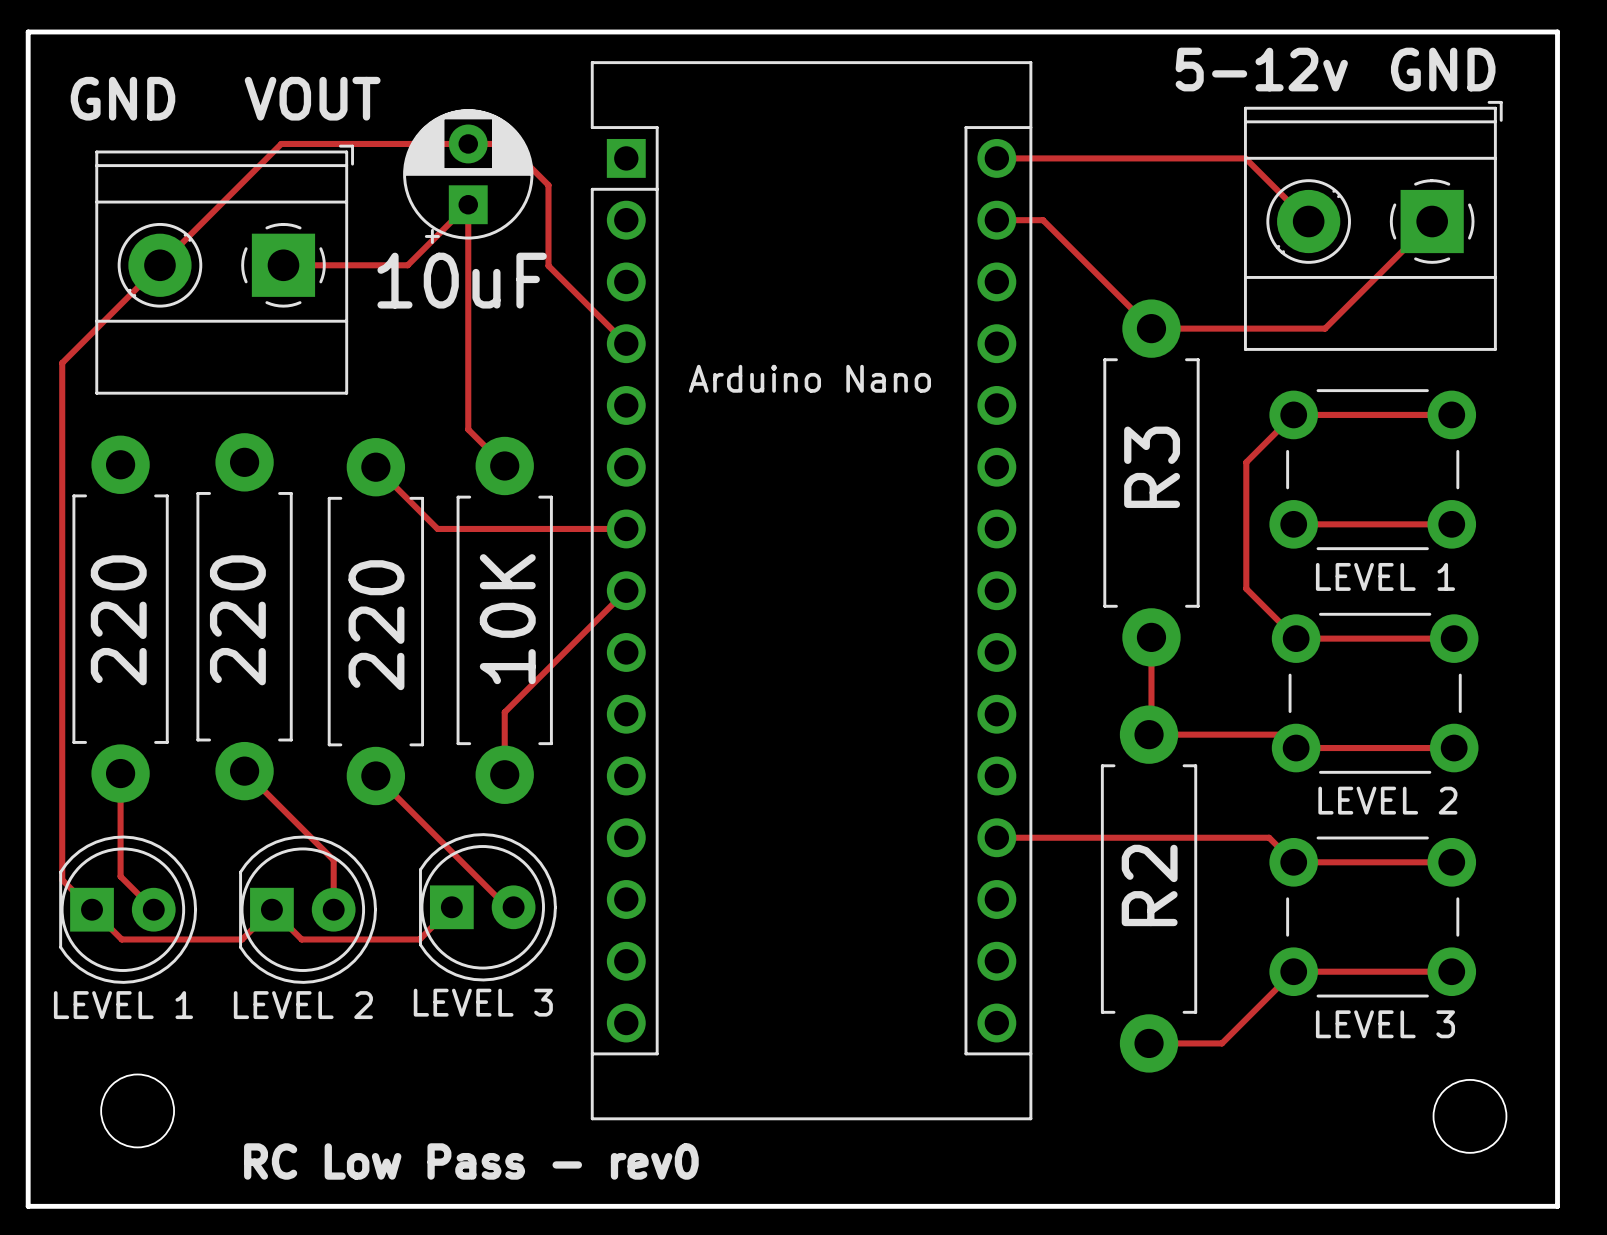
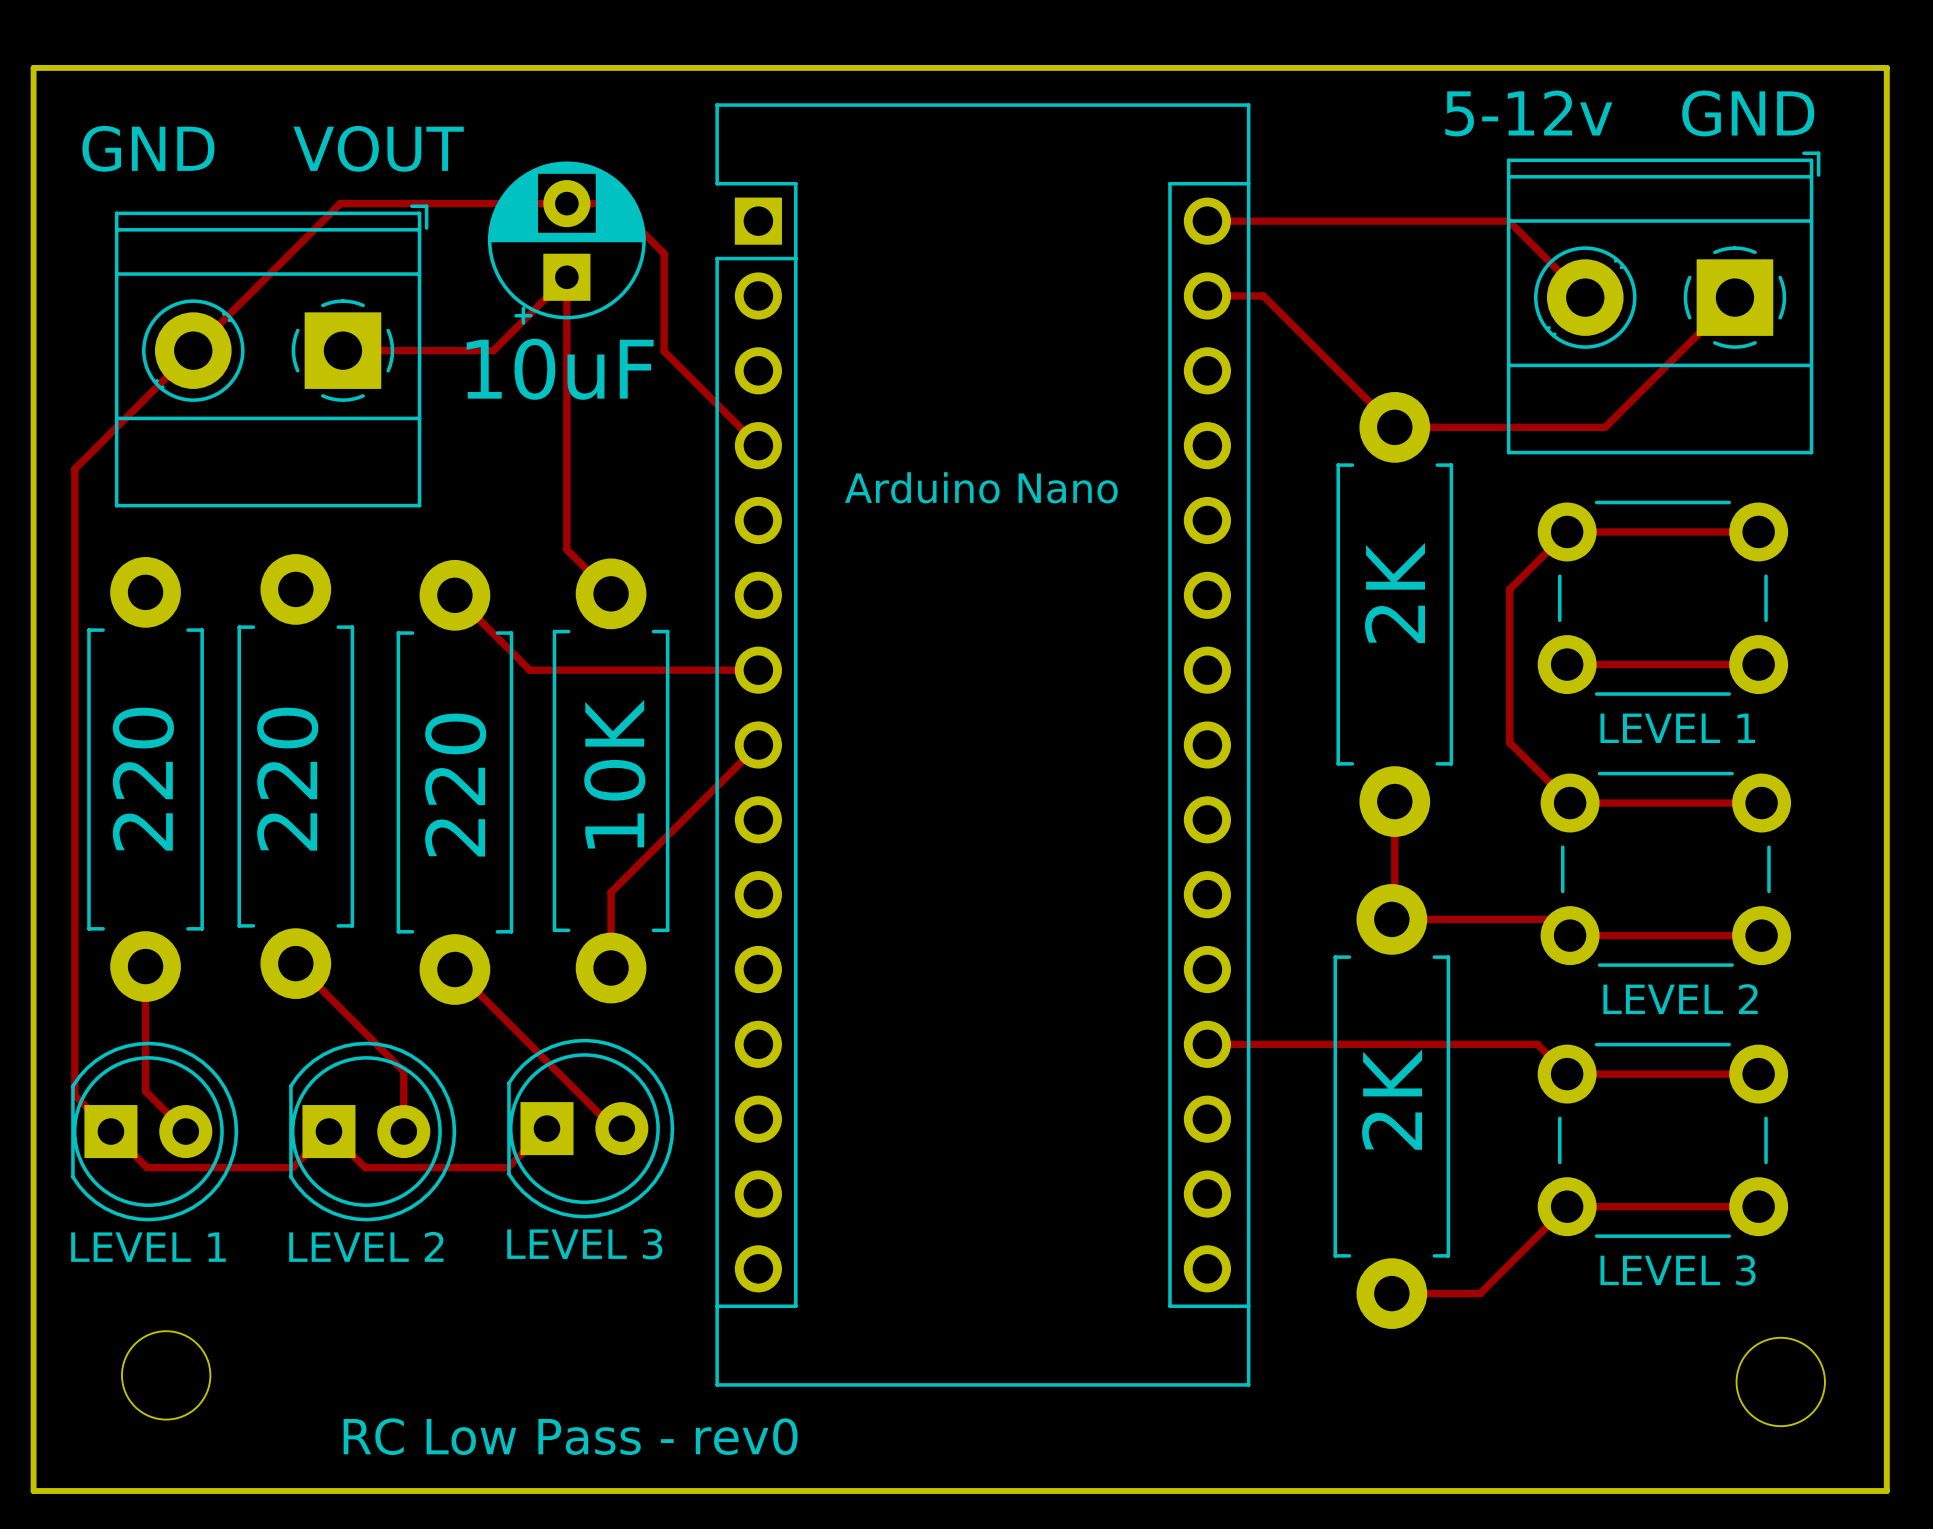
R3 name: R3 (1152, 467) -> 2K (1395, 592)
R2 name: R2 (1149, 885) -> 2K (1392, 1099)

